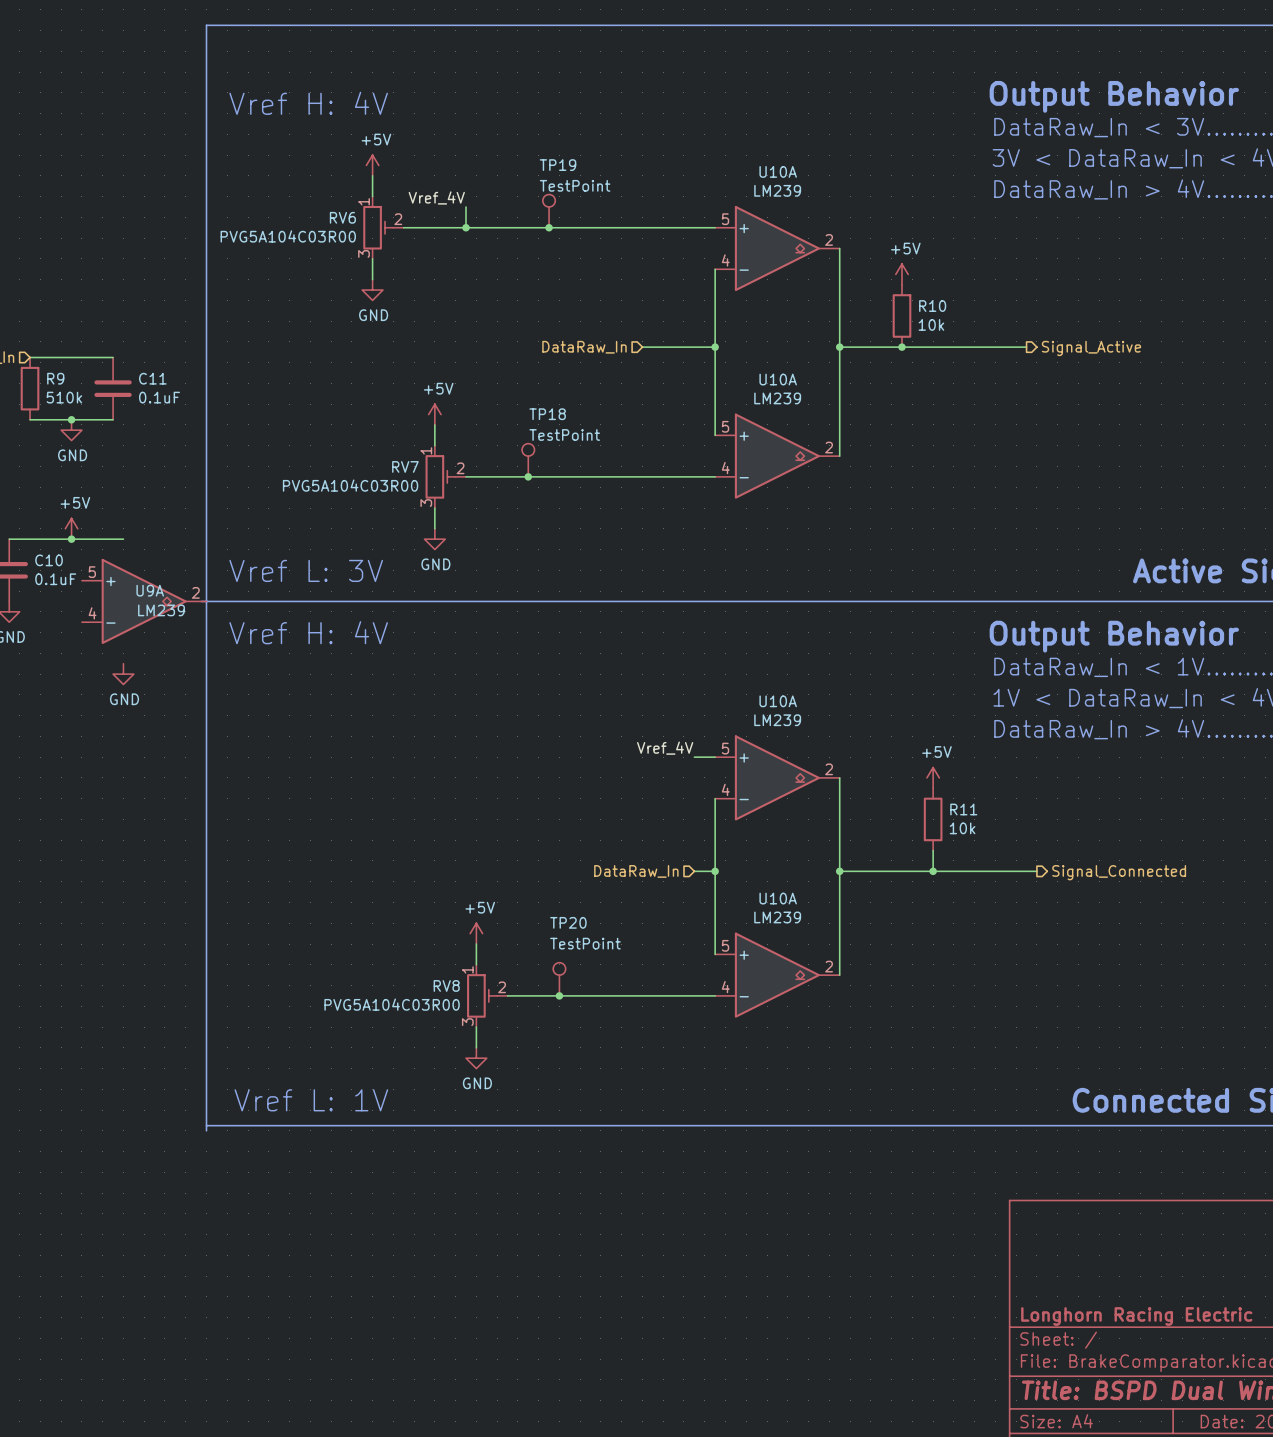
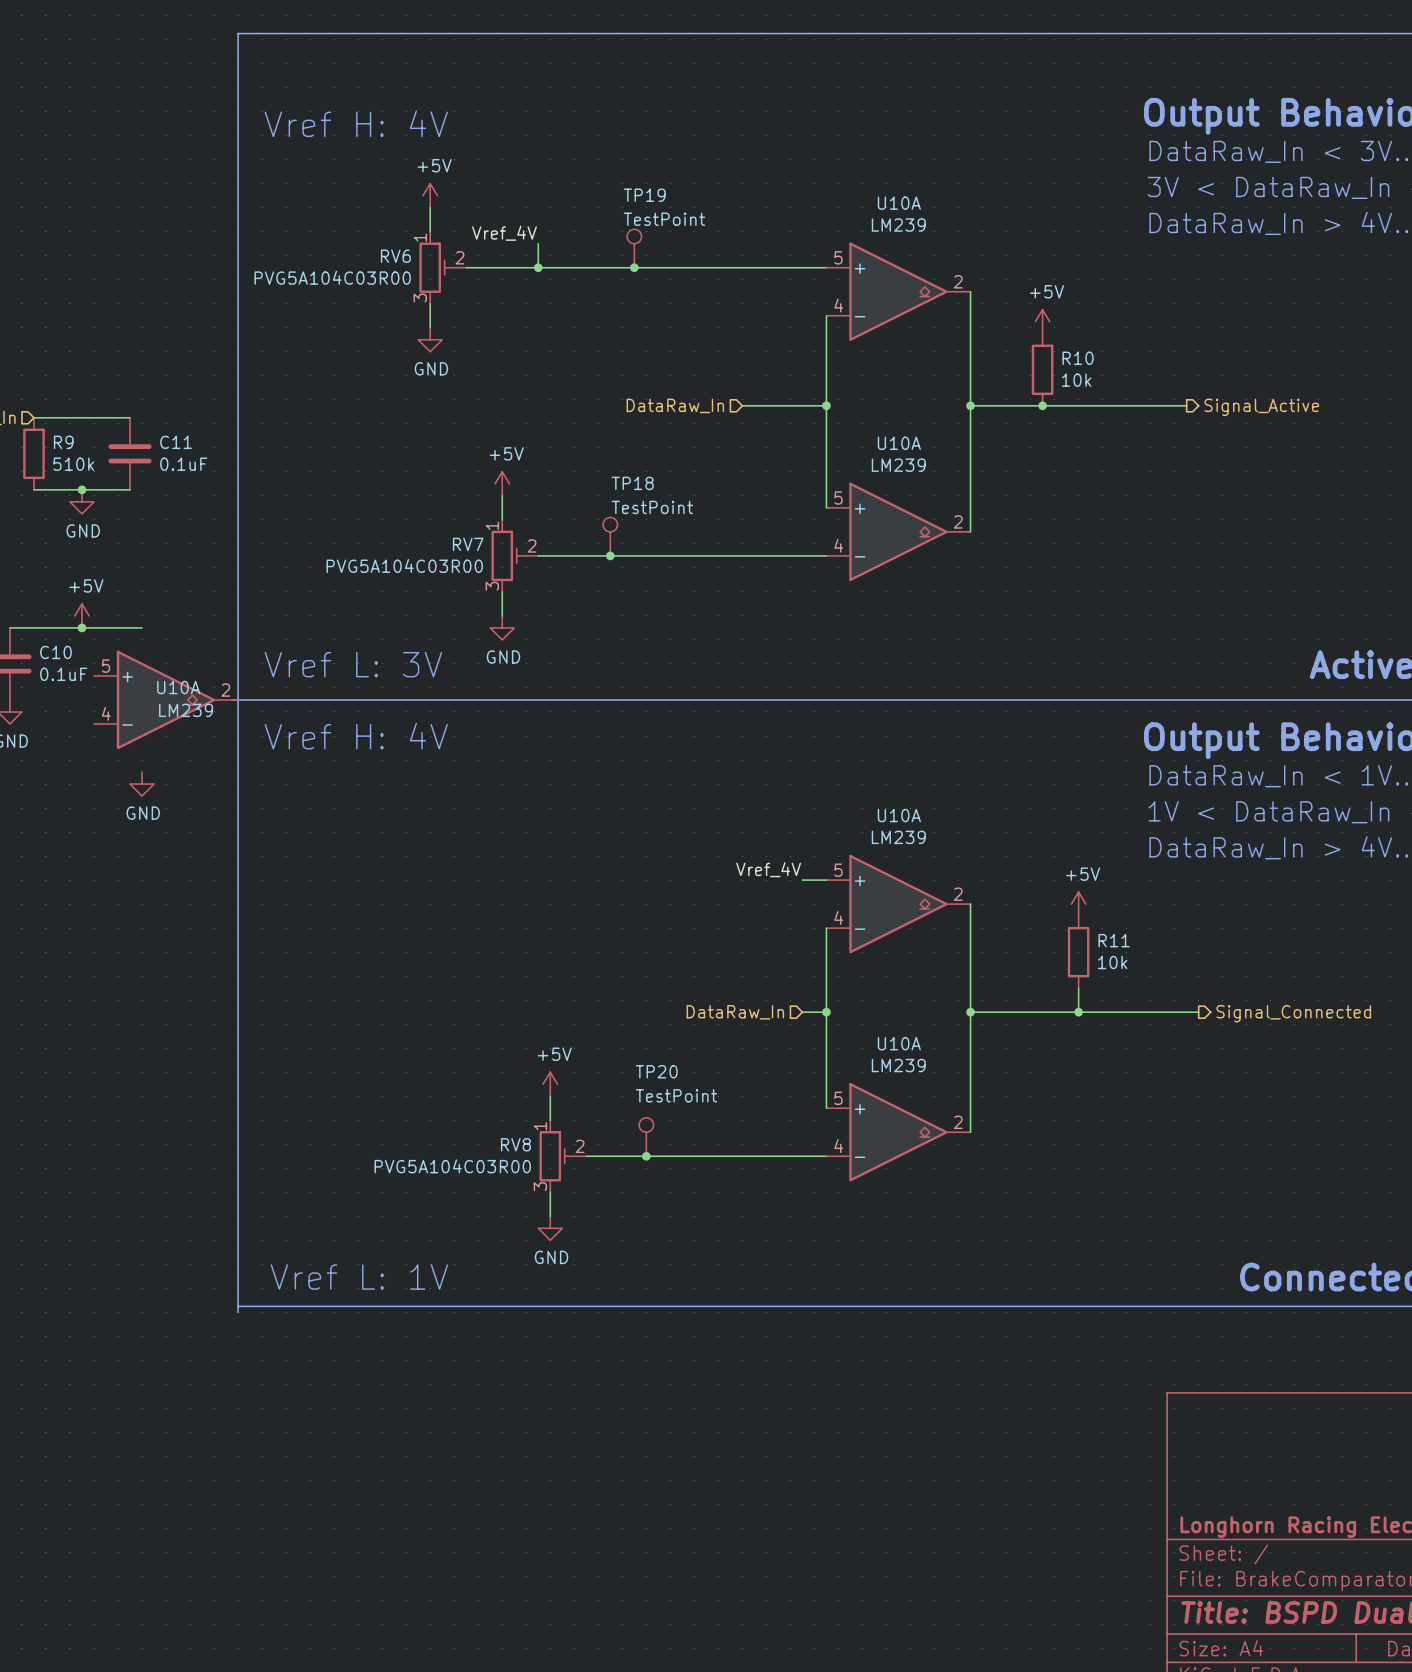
U9A name: U9A (150, 590) -> U10A (178, 687)

